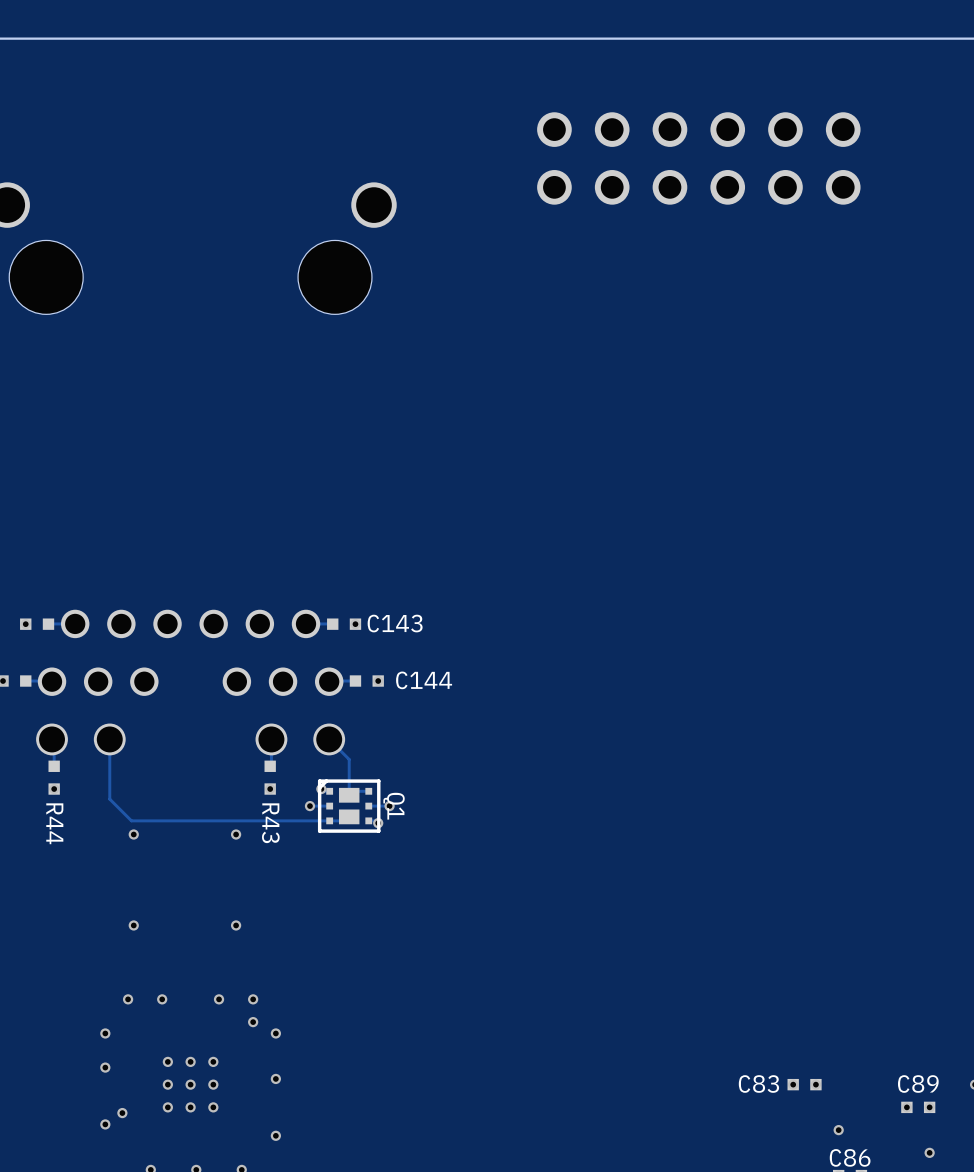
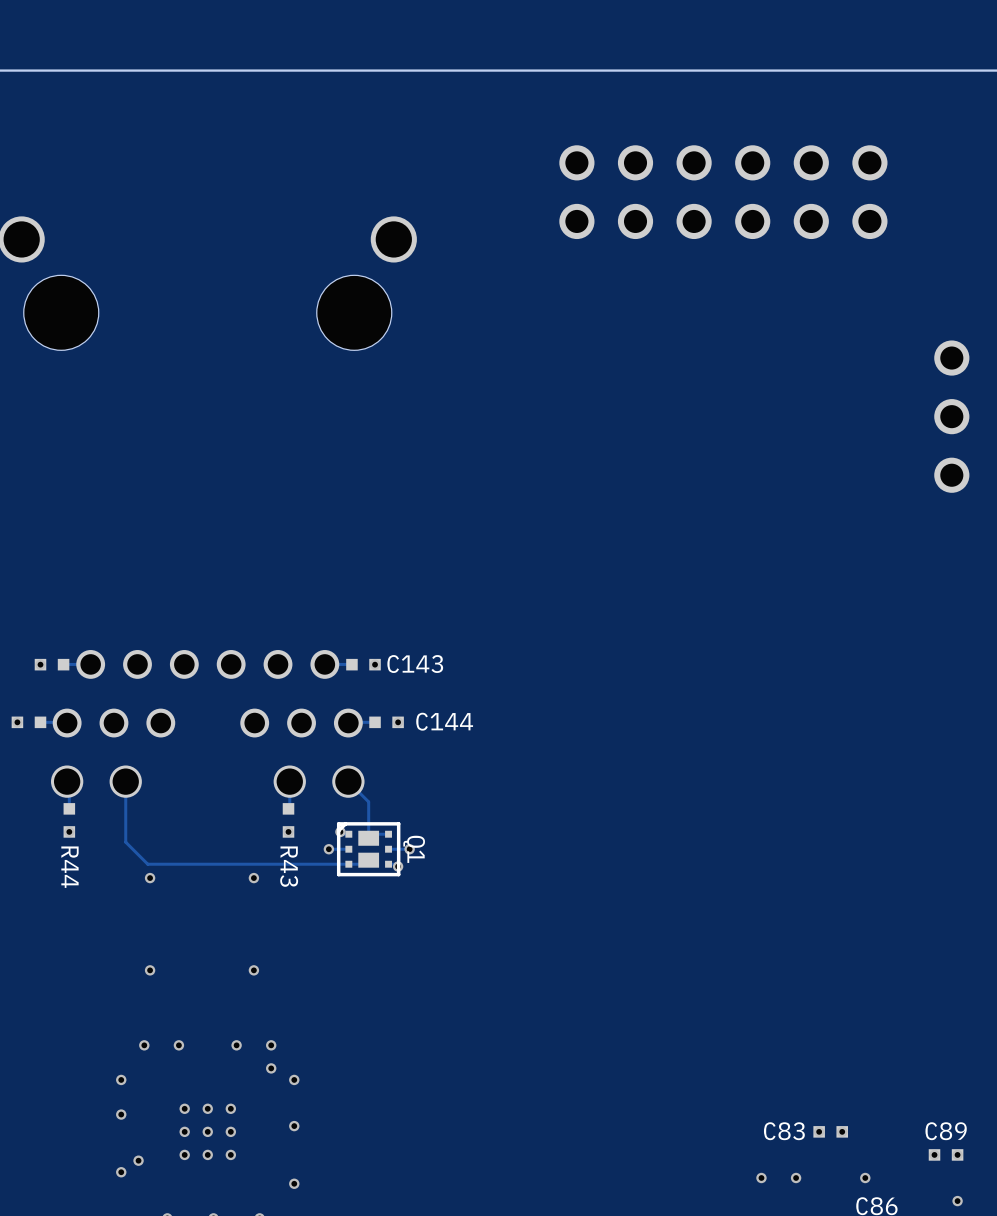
part: none -> (951, 416)
via: none -> (761, 1178)
via: none -> (796, 1178)

